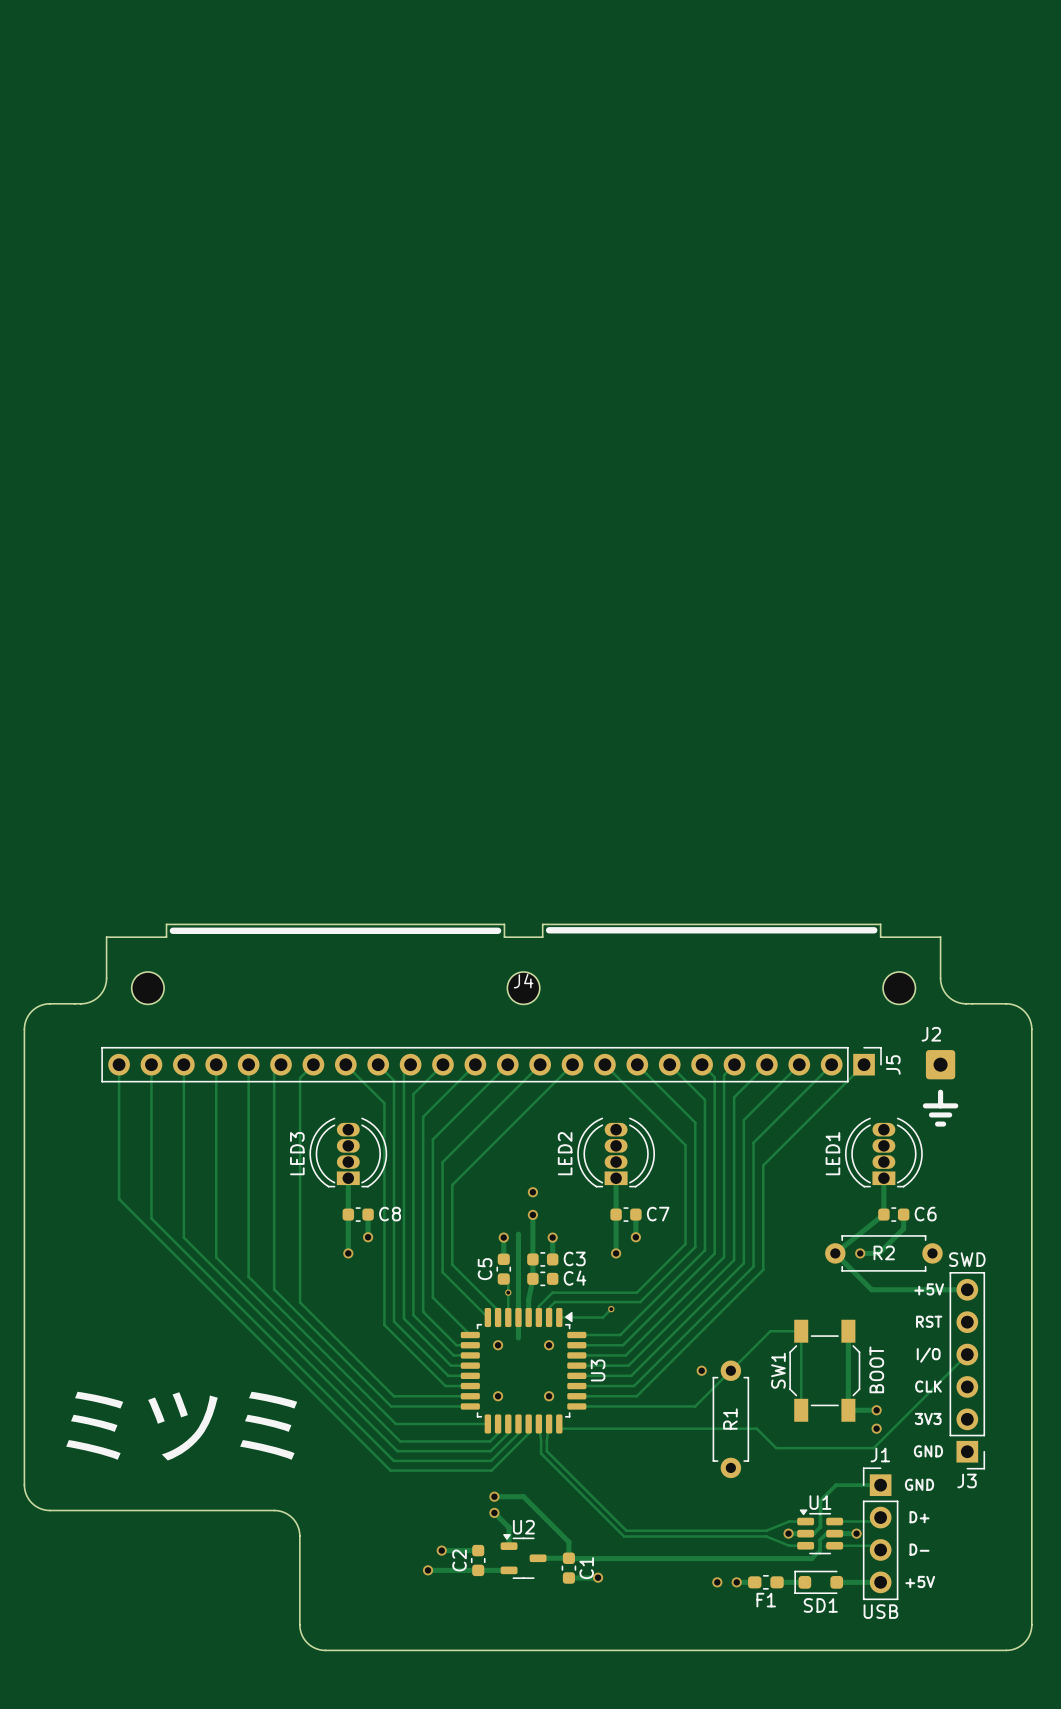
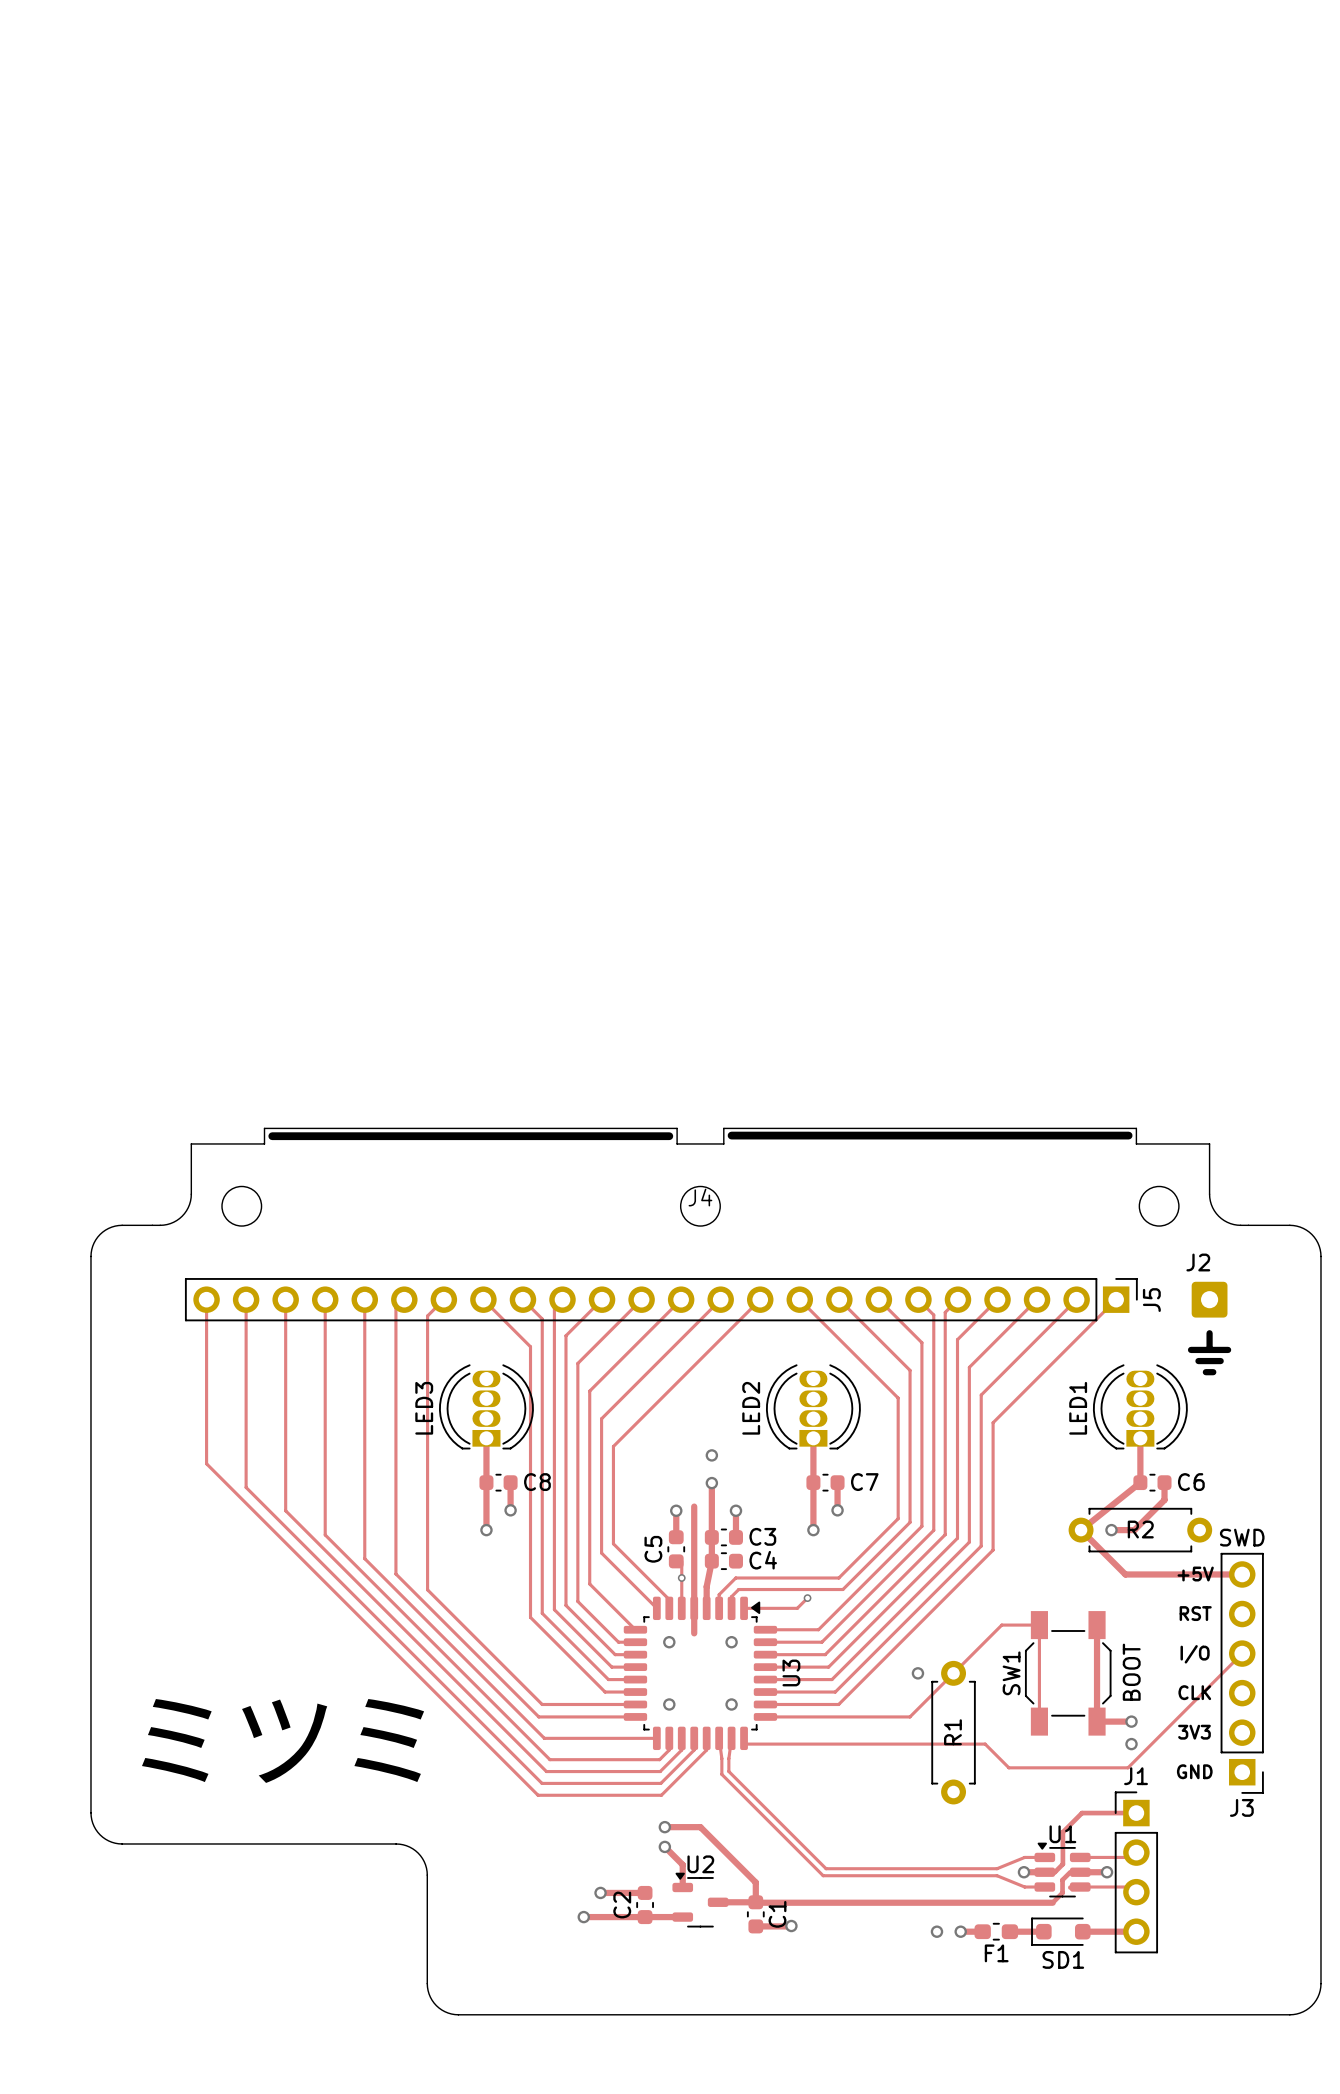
J1 text: GND (919, 1484) -> none
J1 text: D+ (919, 1517) -> none
J1 text: D- (919, 1549) -> none
J1 text: +5V (920, 1581) -> none
J1 value: USB (880, 1611) -> none

